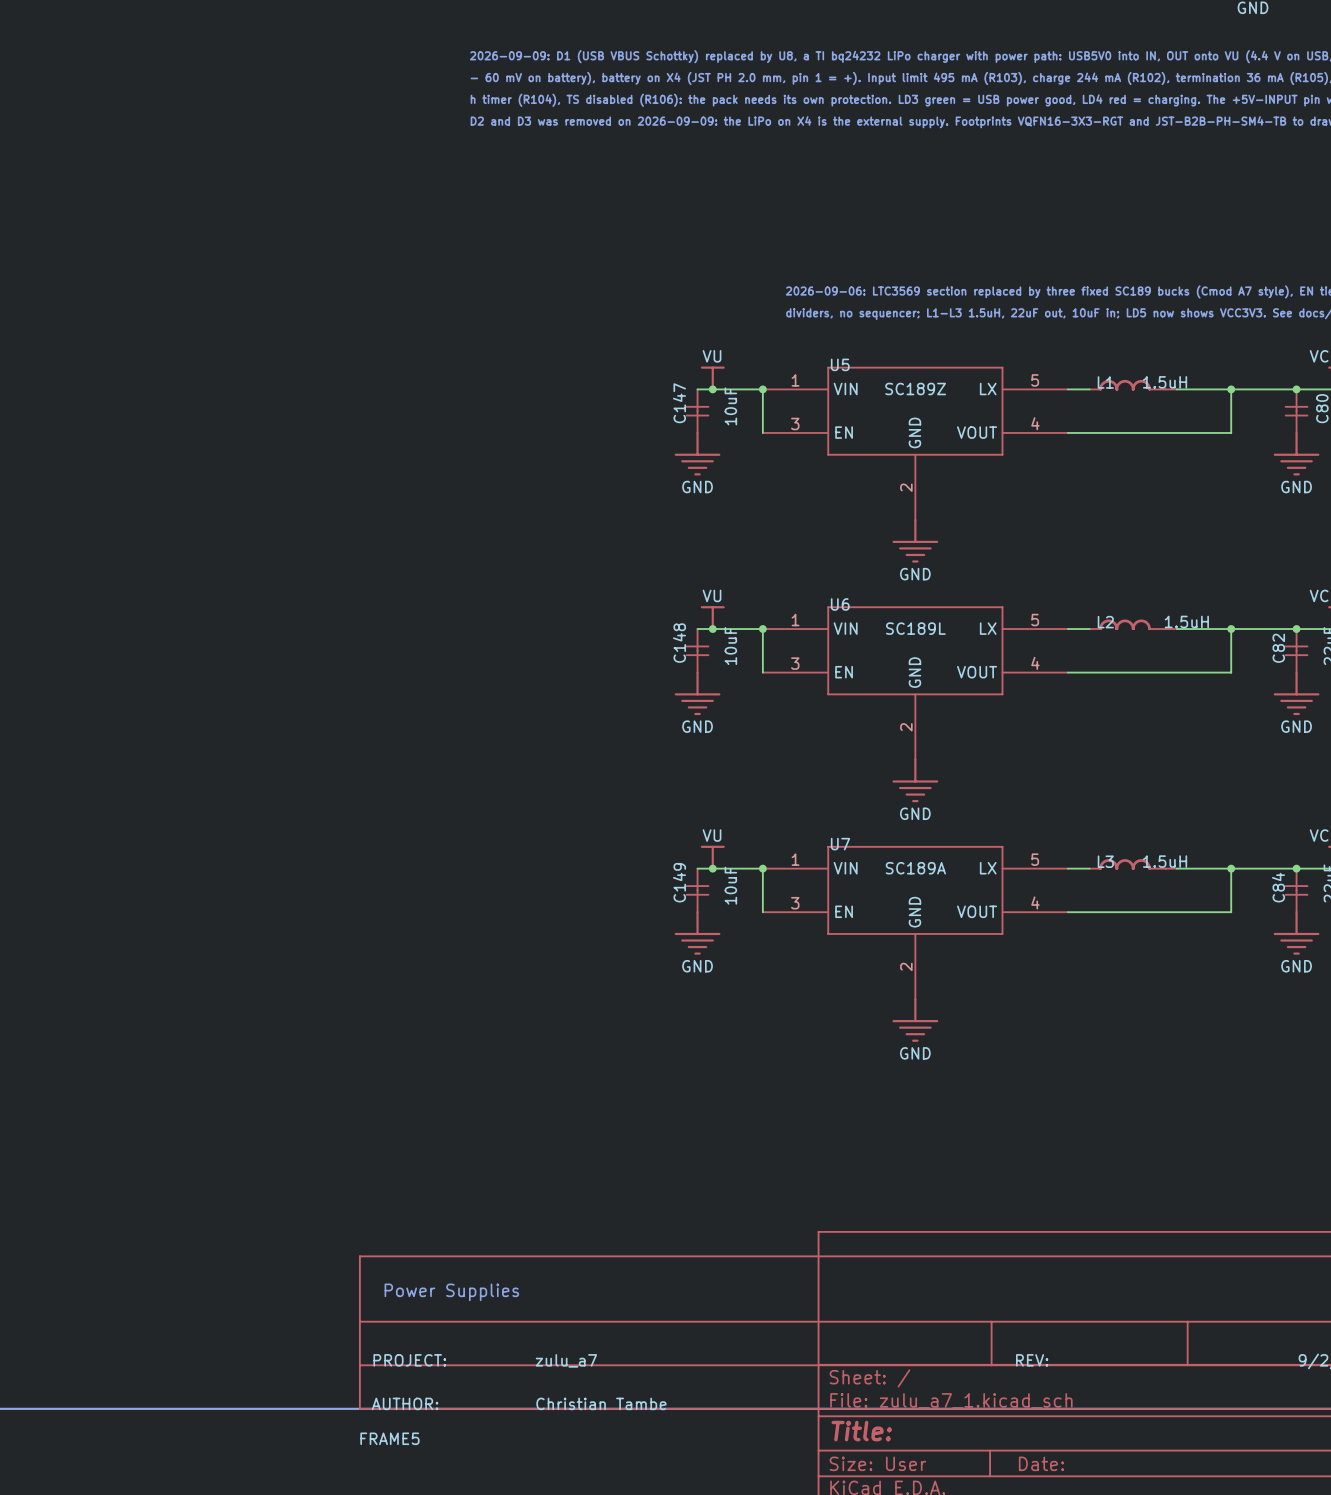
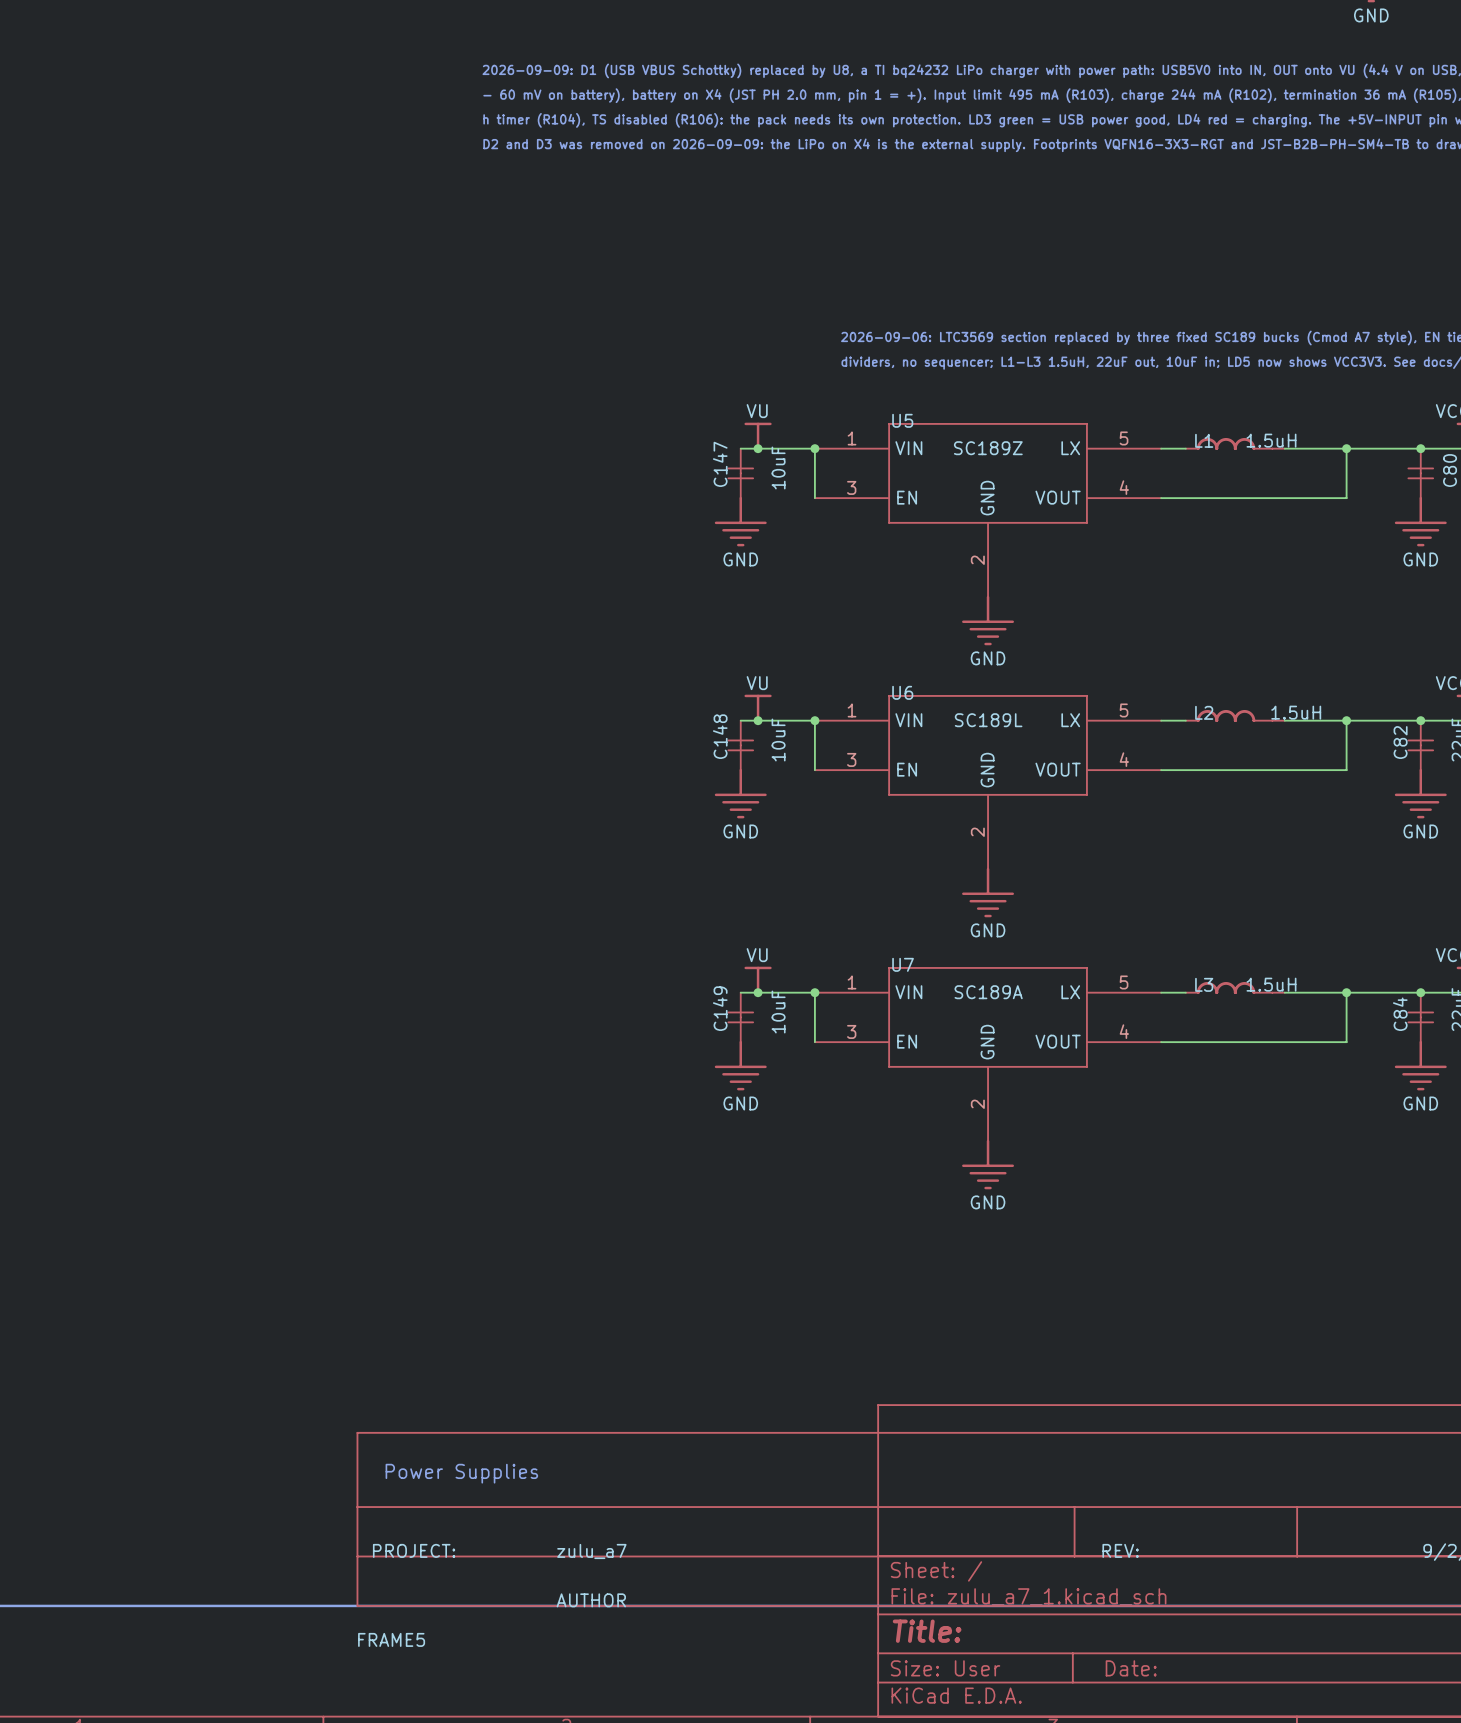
FRAME5 text: AUTHOR: (405, 1403) -> none
FRAME5 text: Christian Tambe (601, 1403) -> AUTHOR (591, 1600)

